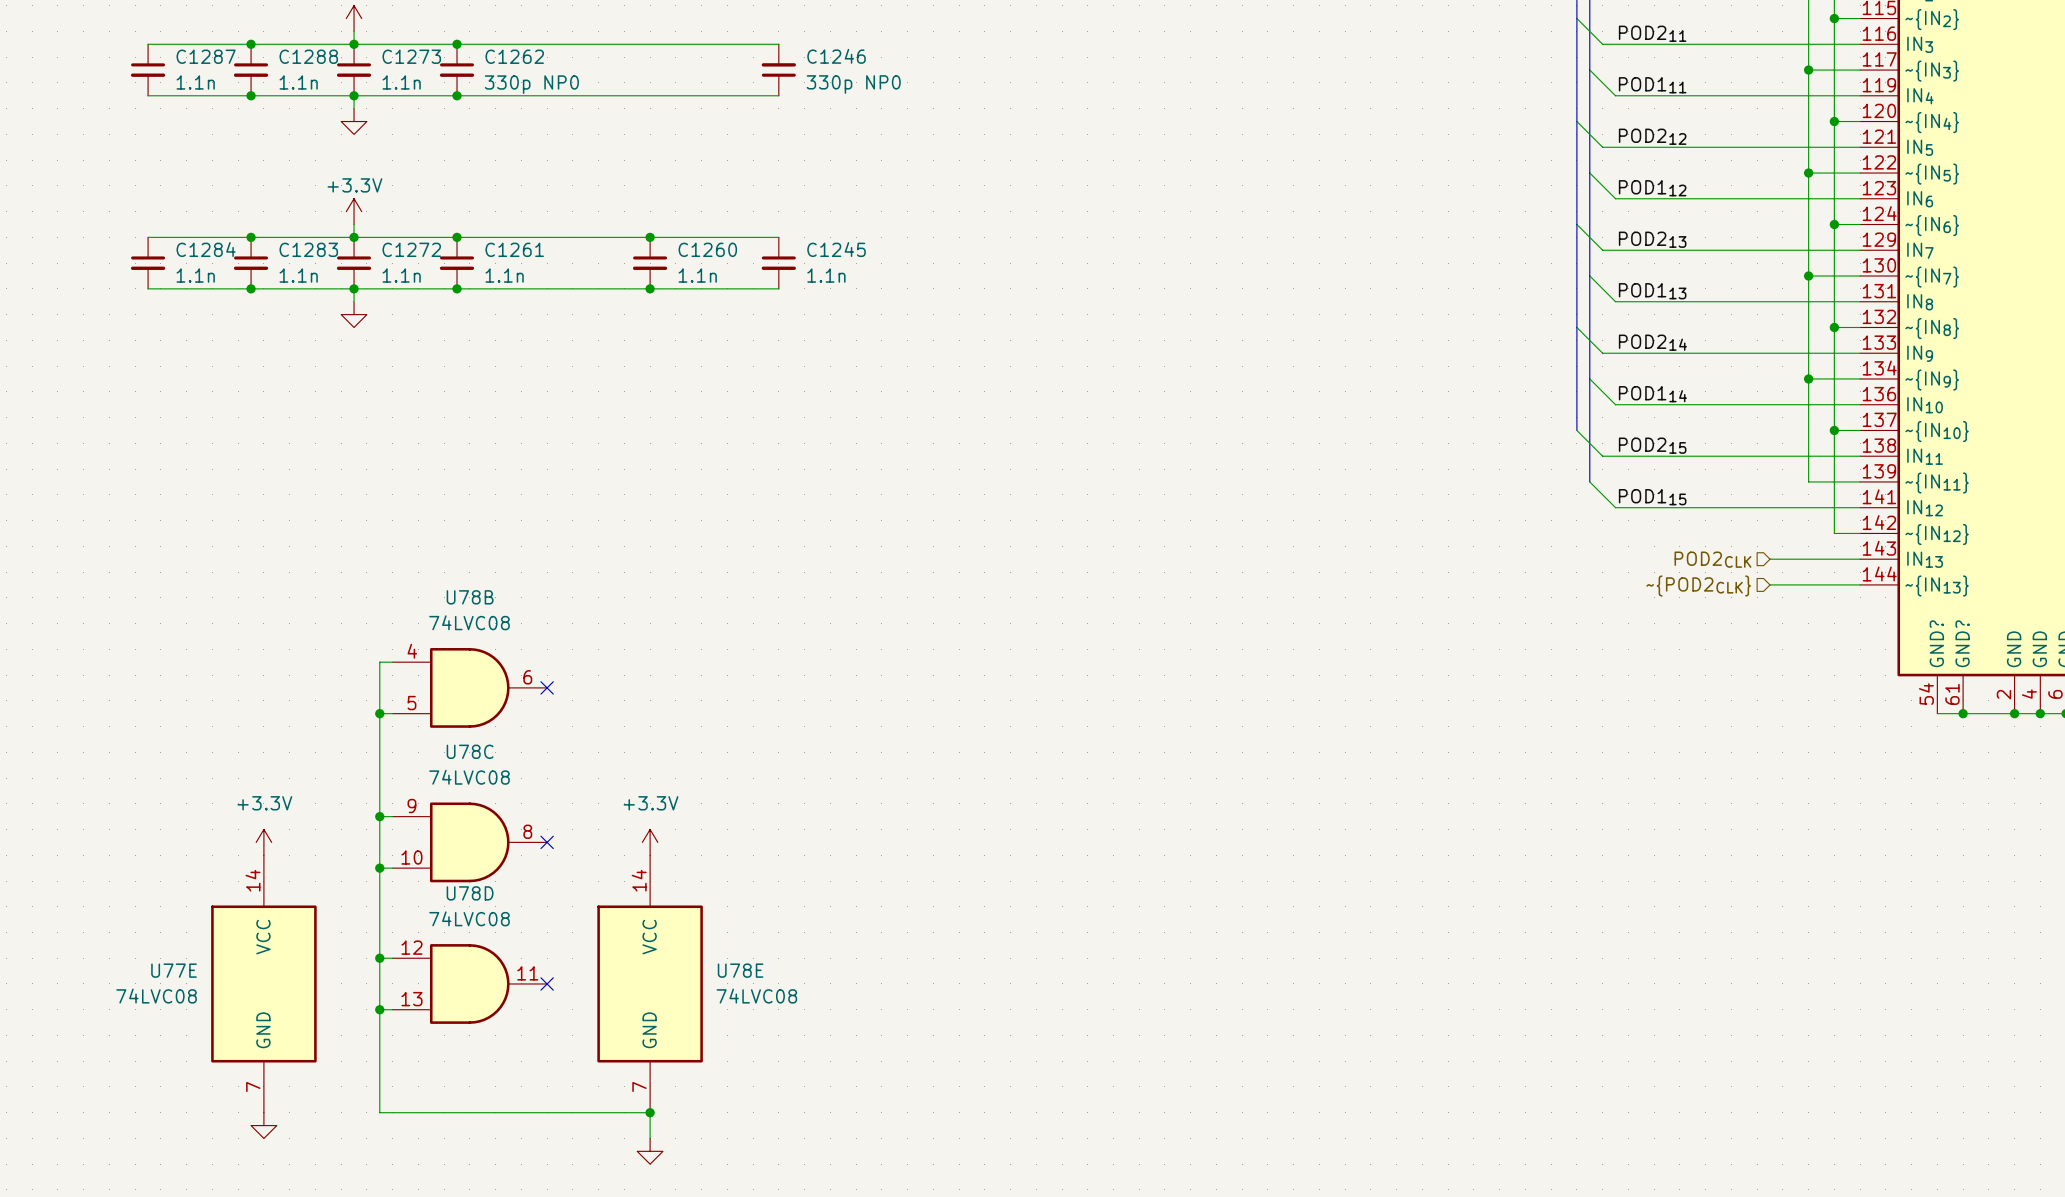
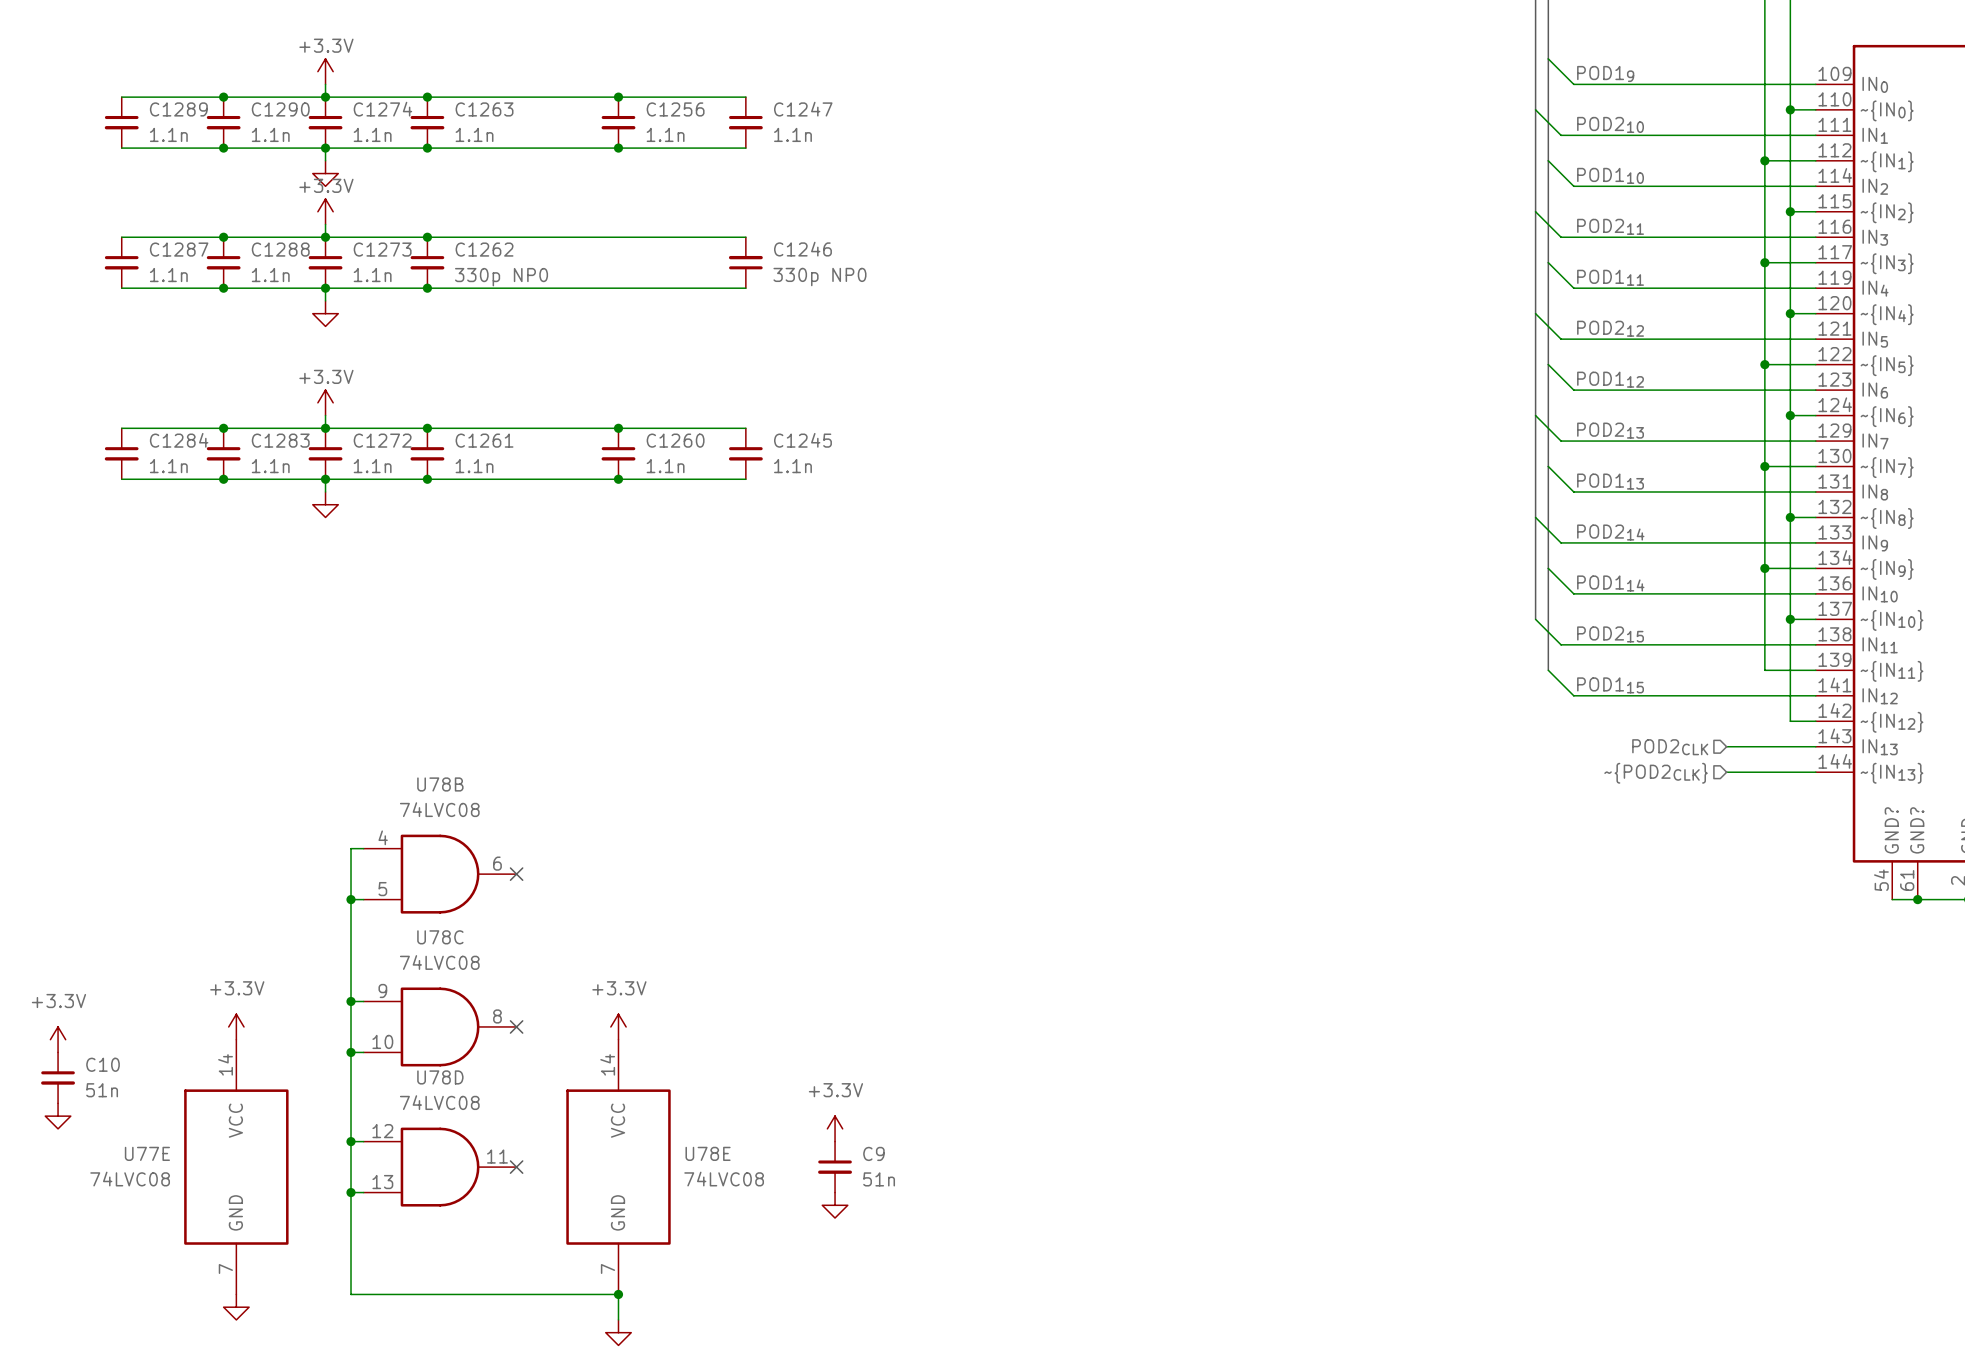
power symbol: none -> +3.3V (58, 1039)
C10: none -> 51n (58, 1077)
power symbol: none -> (58, 1116)
power symbol: none -> +3.3V (835, 1128)
C9: none -> 51n (835, 1167)
power symbol: none -> (835, 1205)

